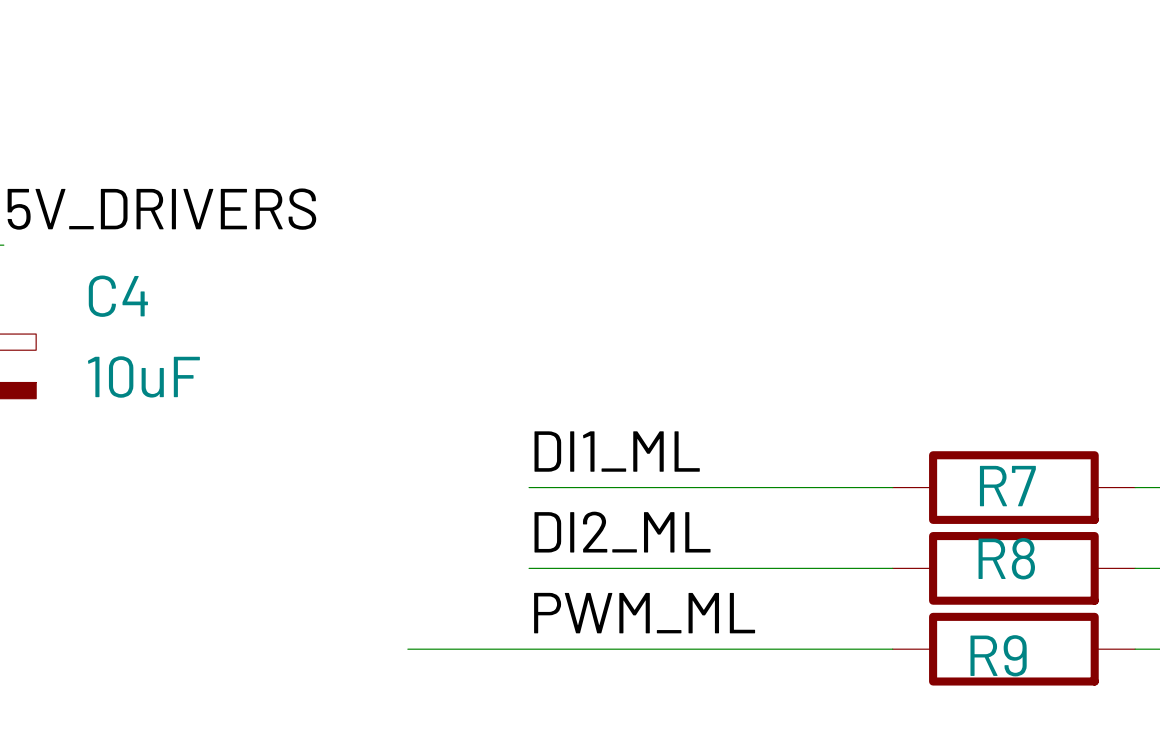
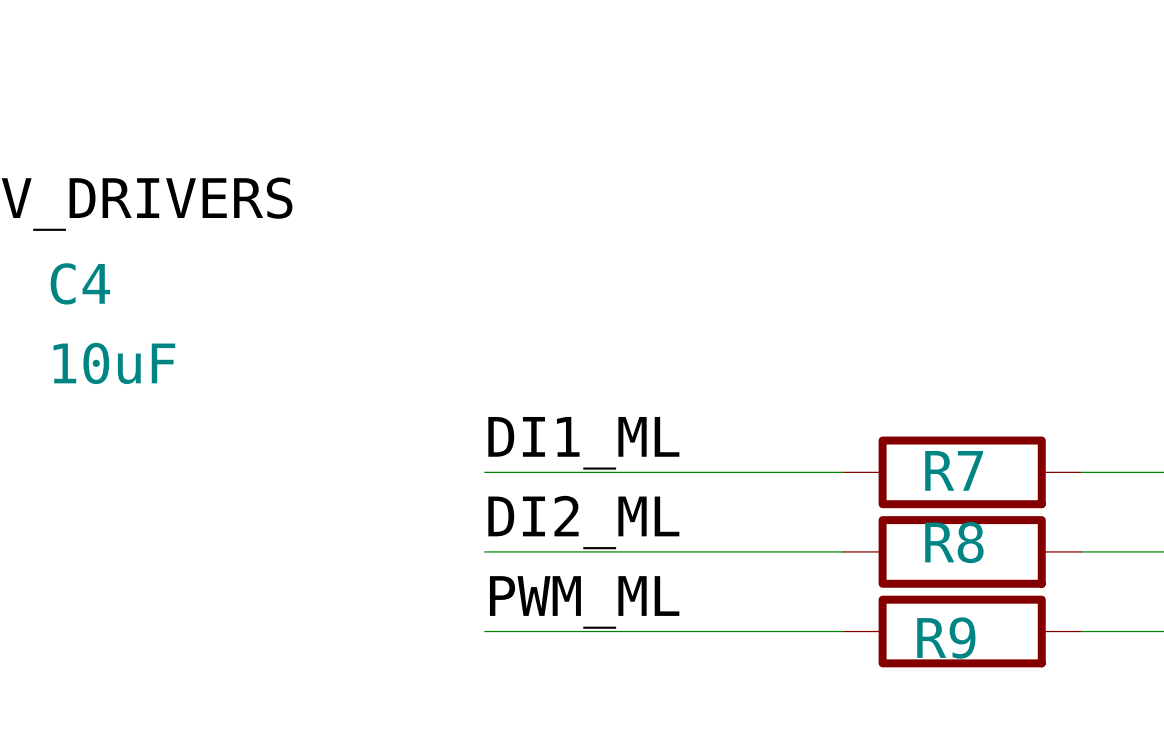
wire: (407, 649) (529, 649) -> none

